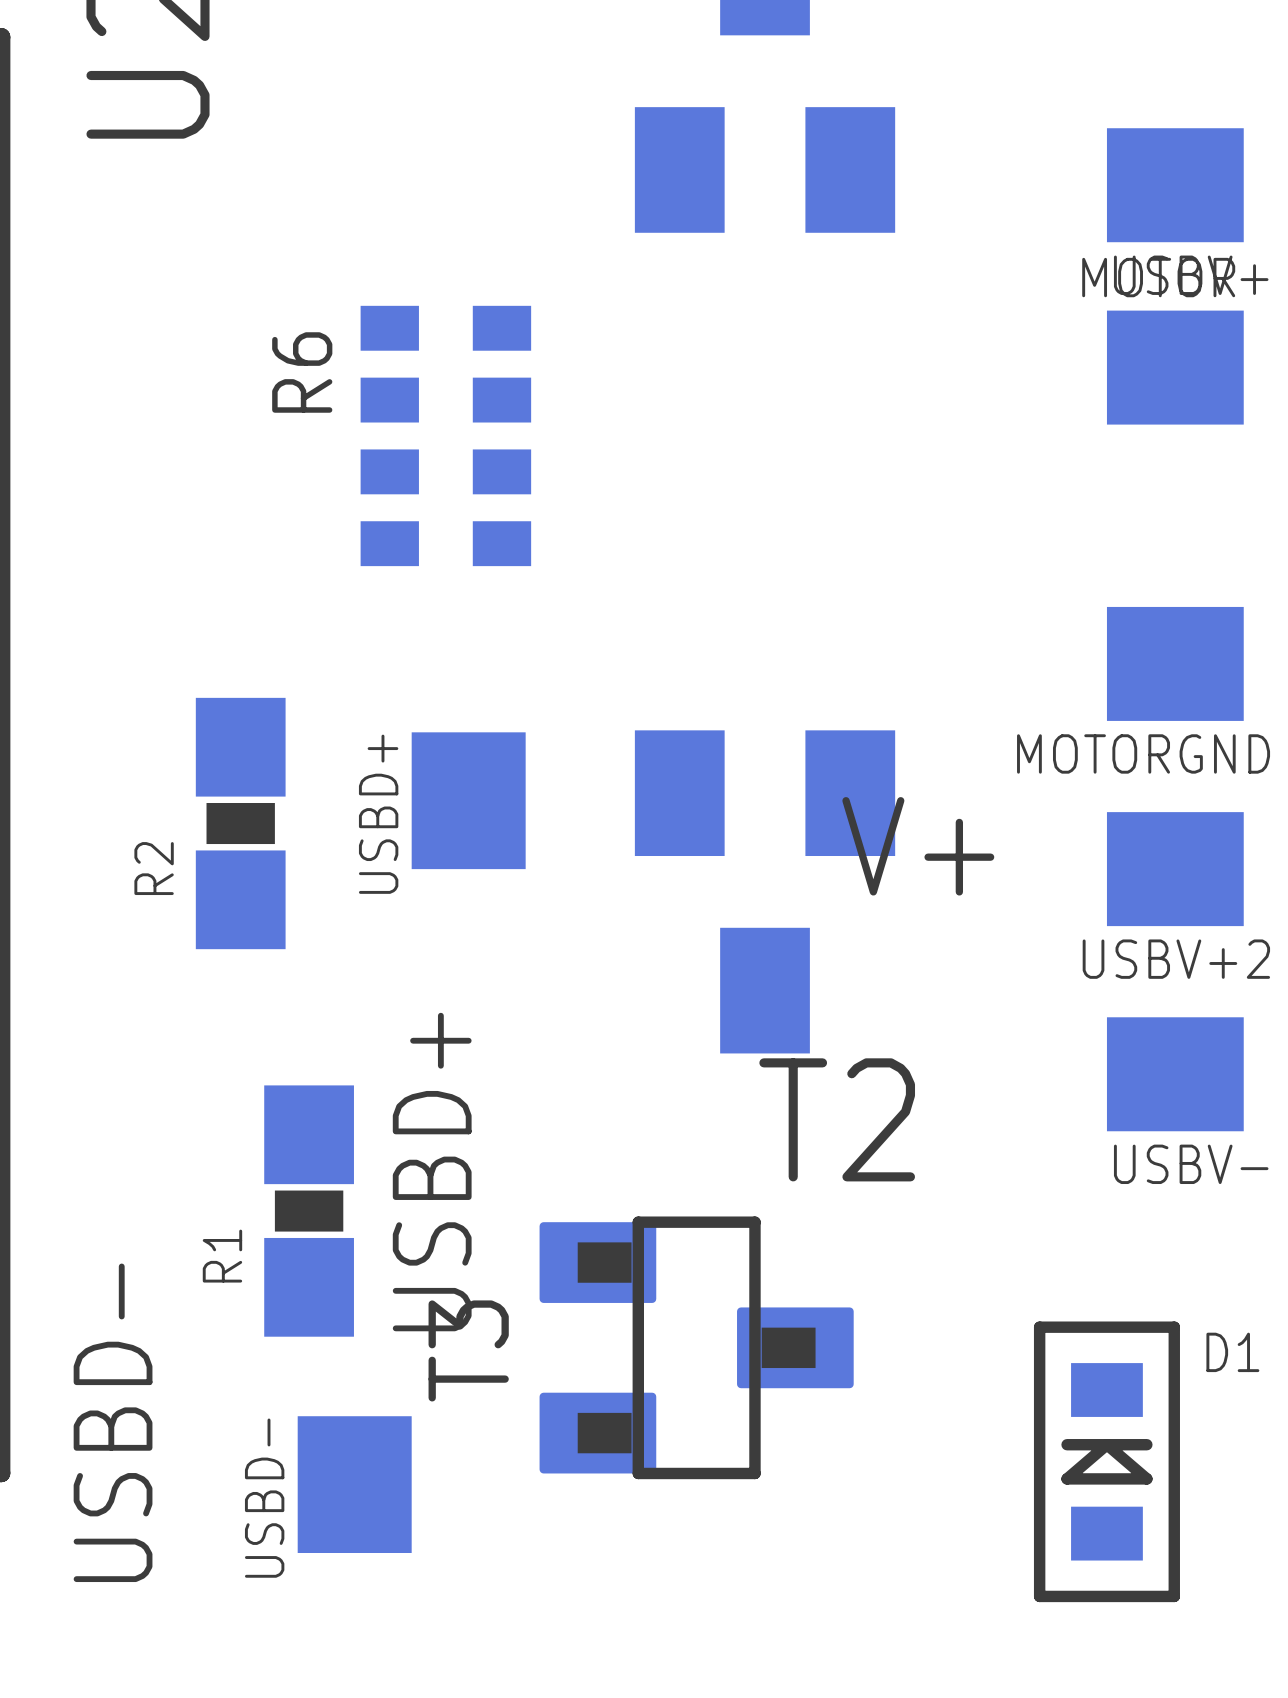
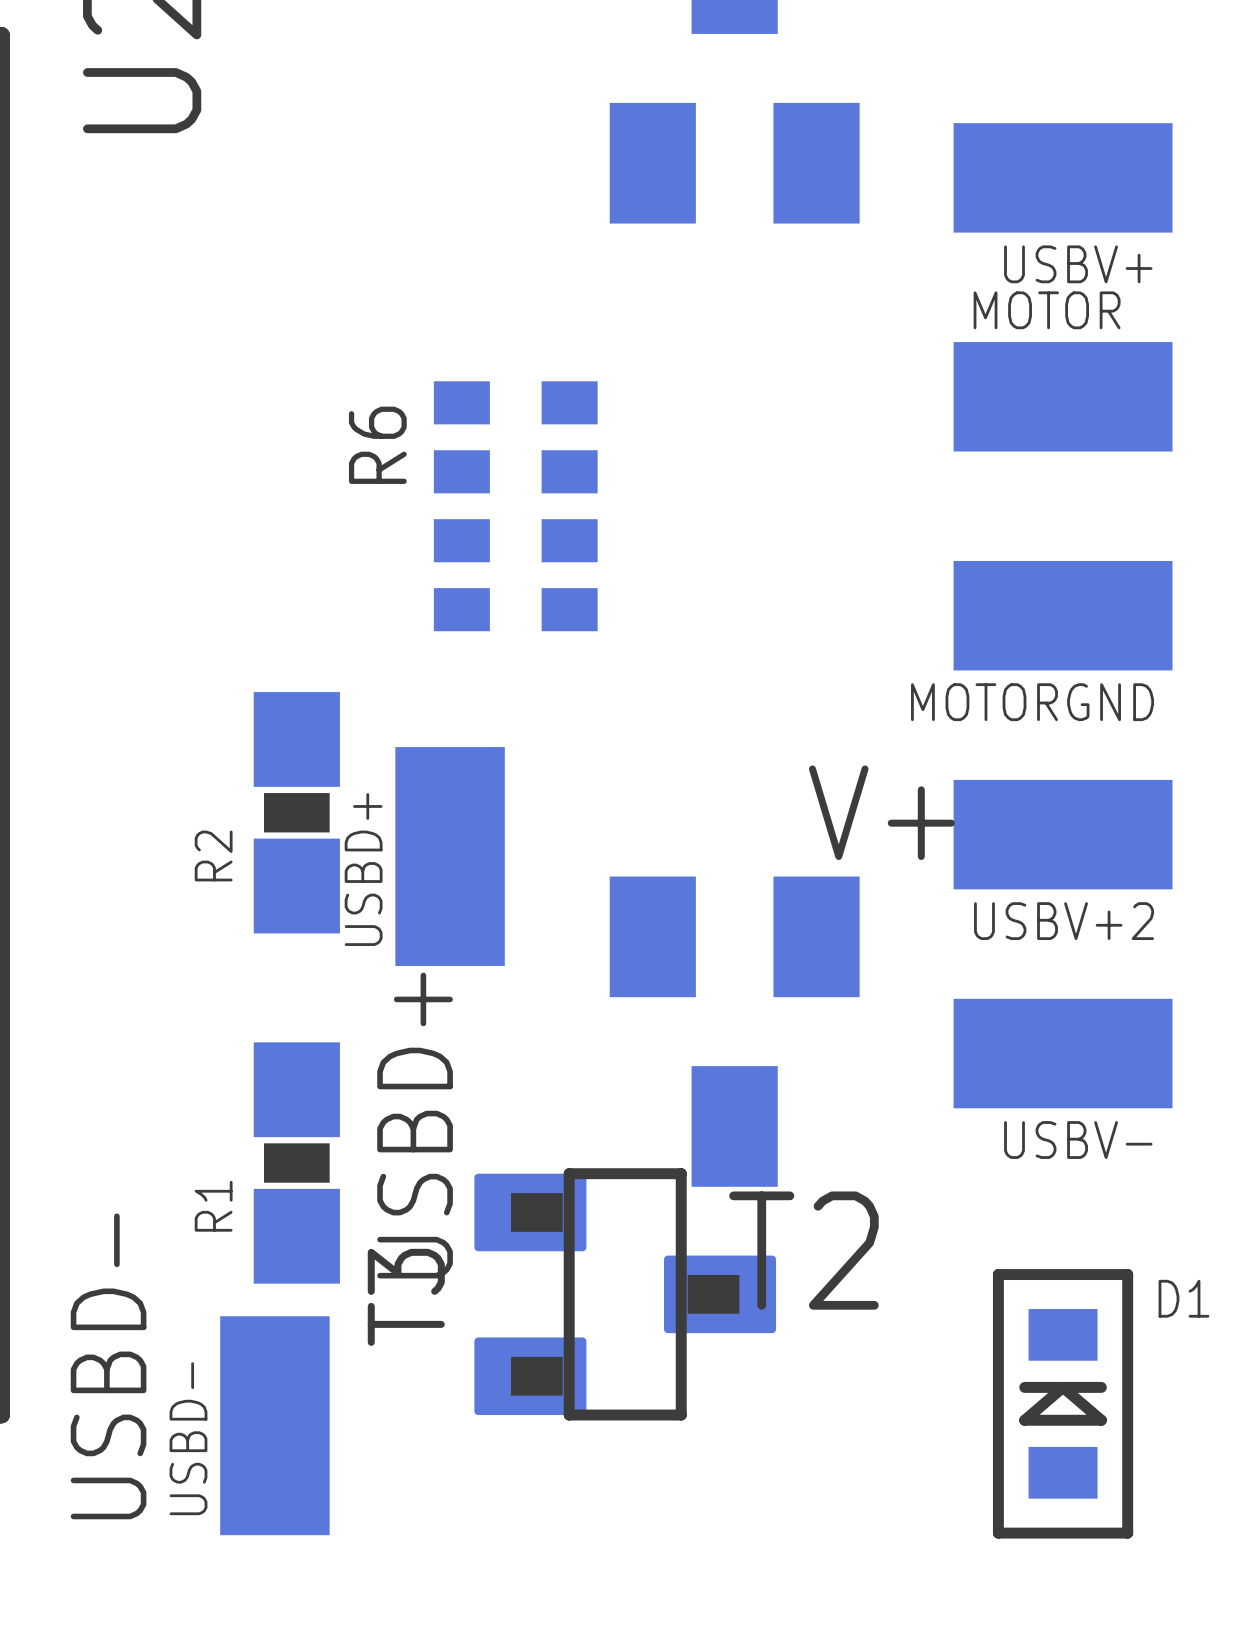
USBV+ footprint: [1106, 128, 1244, 243] -> [953, 123, 1173, 233]
MOTOR footprint: [1106, 310, 1244, 425] -> [953, 342, 1173, 452]
R6 position: (445, 435) -> (515, 506)
MOTORGND footprint: [1106, 606, 1244, 721] -> [953, 560, 1173, 671]
USBD+: (468, 800) -> none
USBV+2 footprint: [1106, 812, 1244, 927] -> [953, 779, 1173, 890]
R2 position: (240, 823) -> (296, 812)
USBD+: none -> (450, 856)
T2 position: (765, 891) -> (734, 1031)
USBV- footprint: [1106, 1017, 1244, 1132] -> [953, 998, 1173, 1109]
T3 position: (696, 1347) -> (625, 1294)
USBD- footprint: [297, 1416, 412, 1553] -> [220, 1316, 330, 1536]
USBD- name position: USBD- (264, 1498) -> USBD- (188, 1438)

